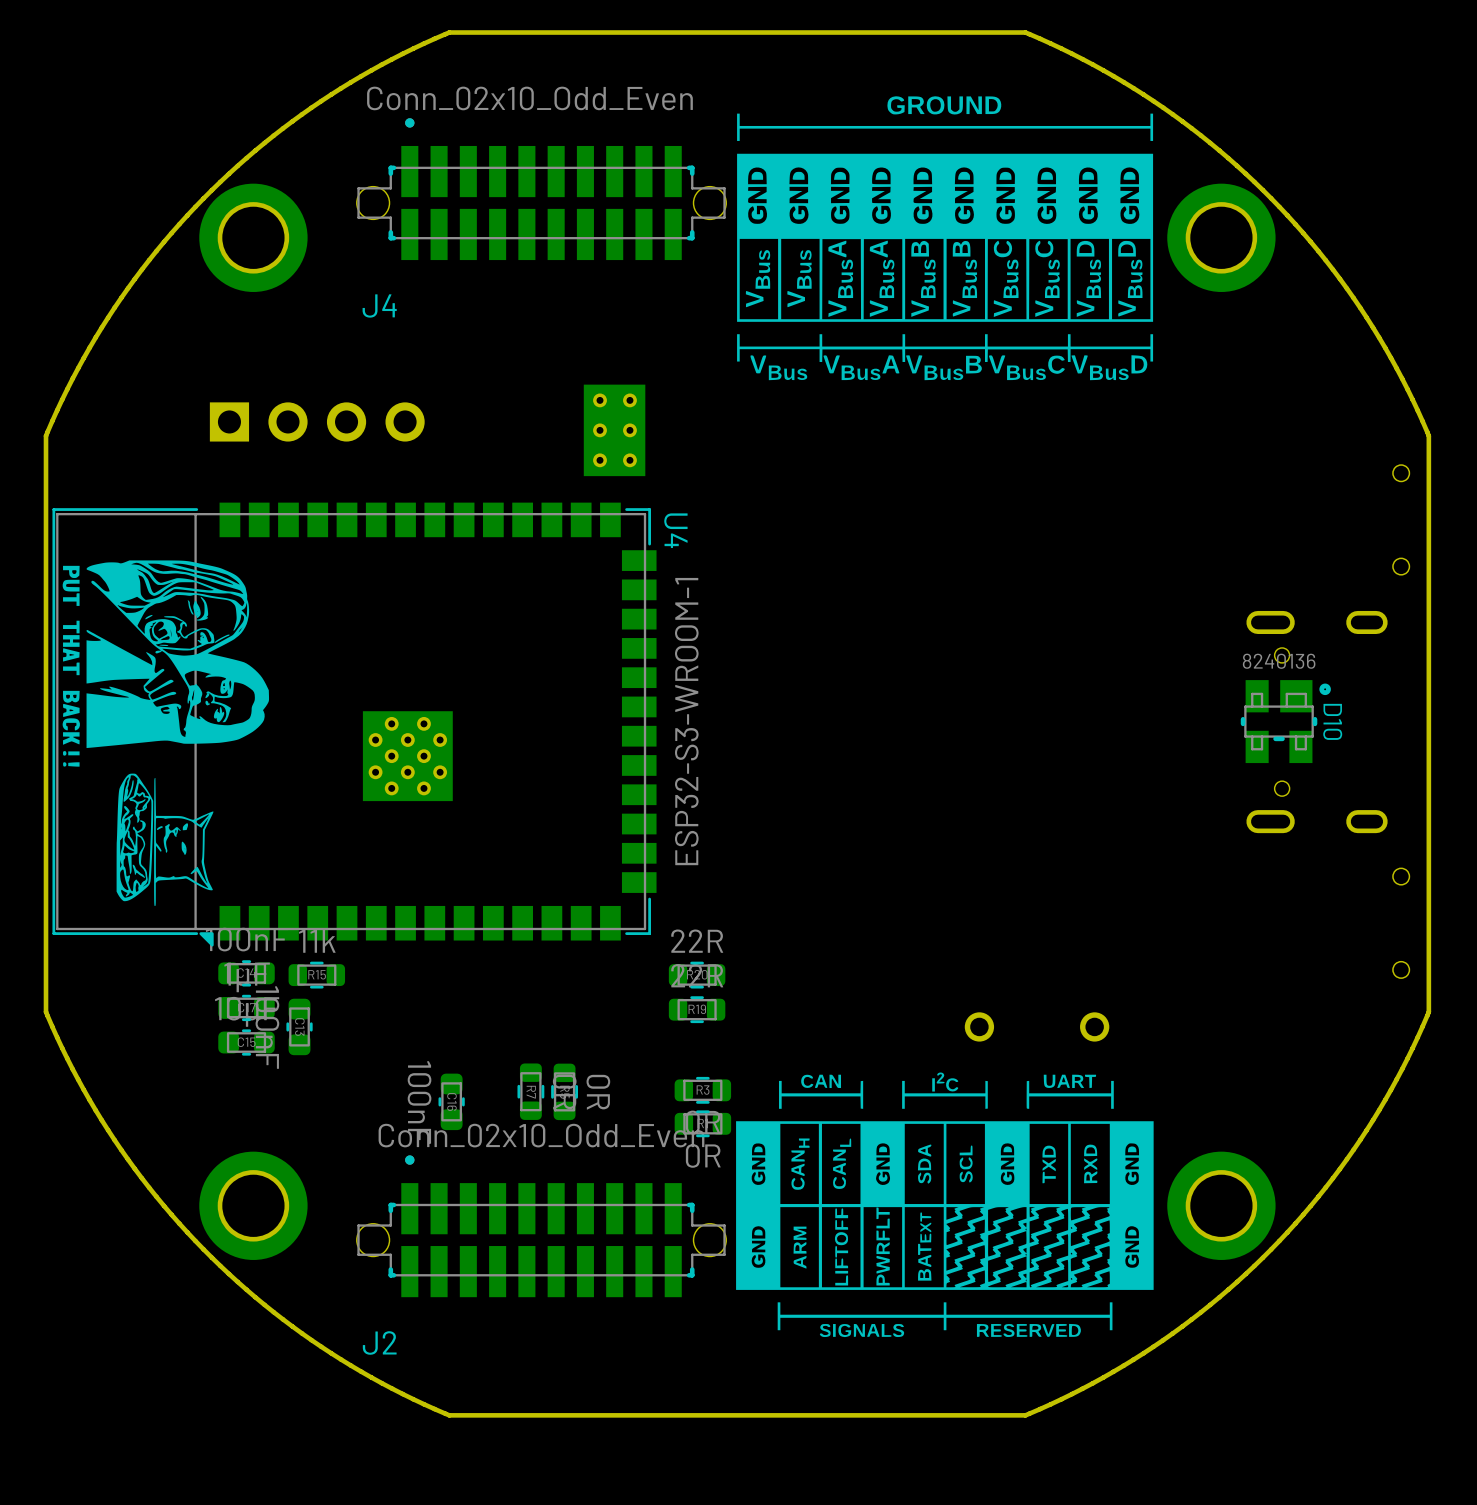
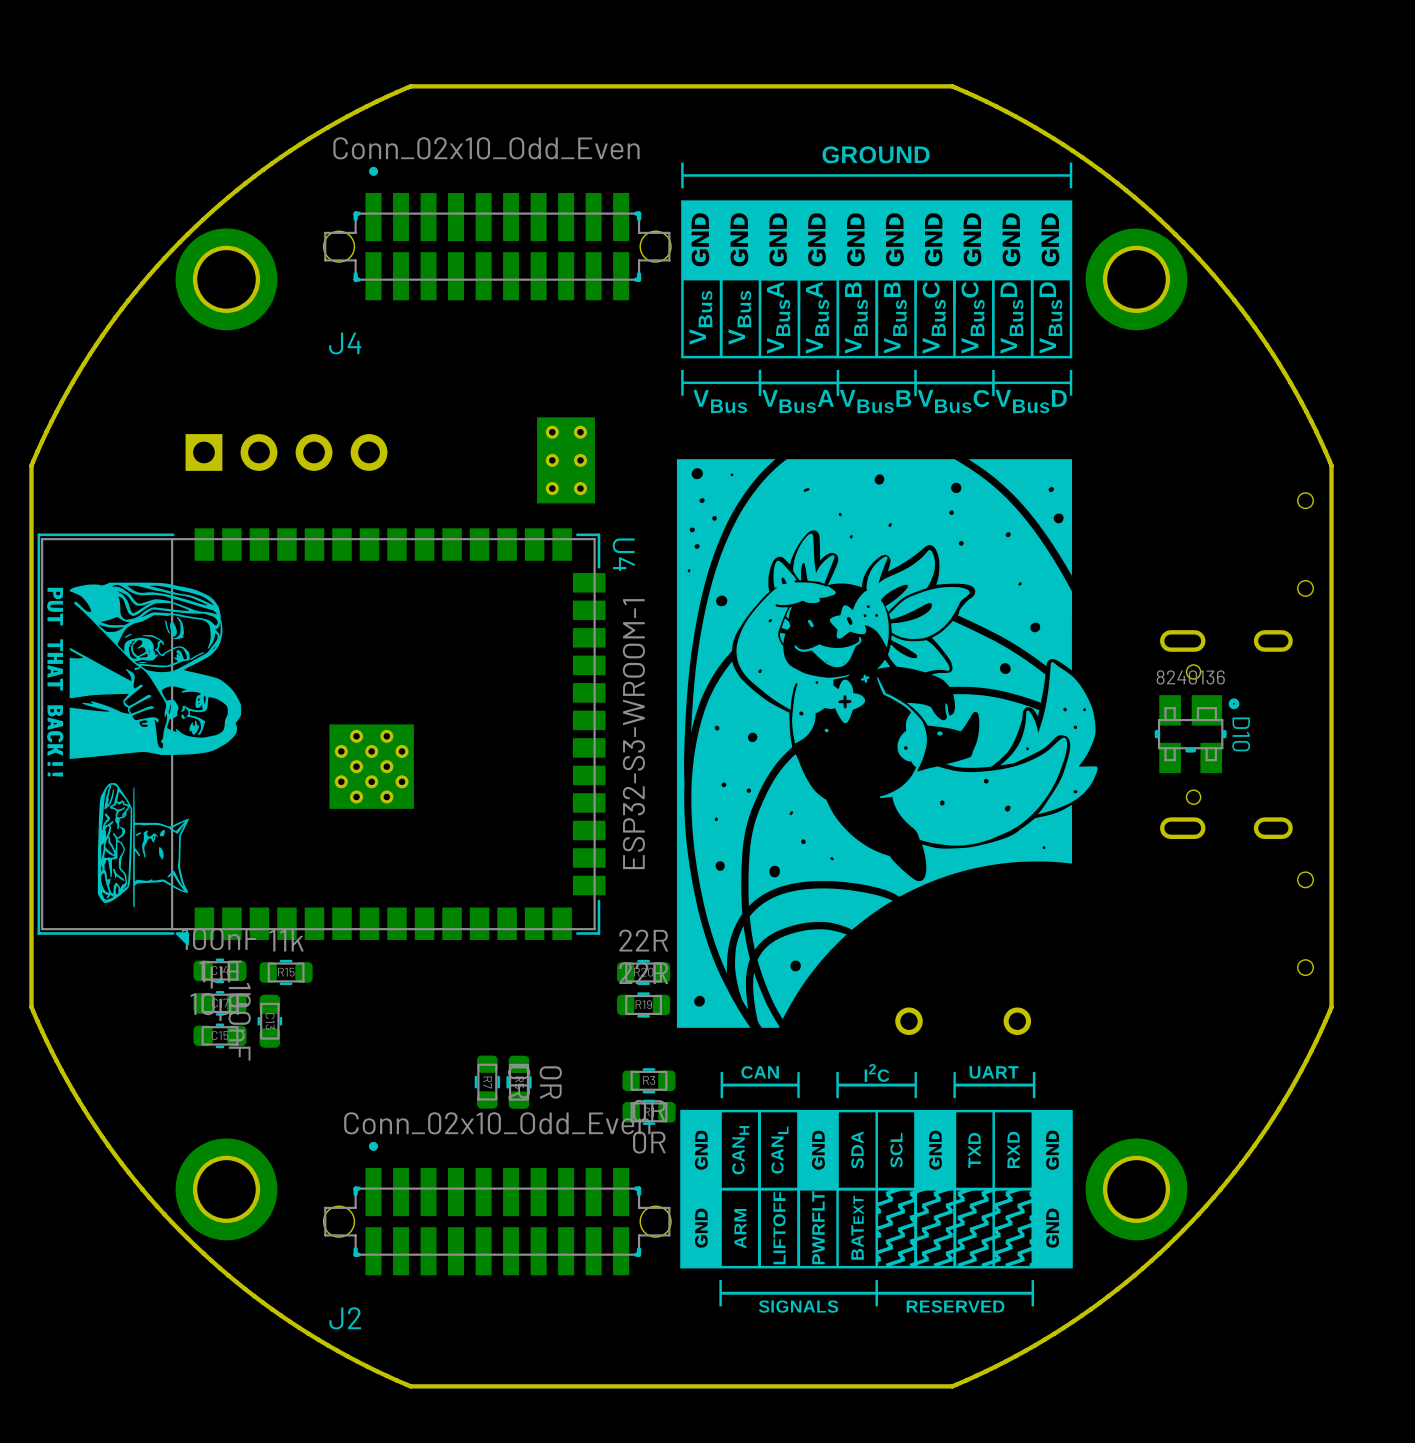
drawing: none -> [676, 459, 1098, 1028]
C16: 100nF (451, 1101) -> none

